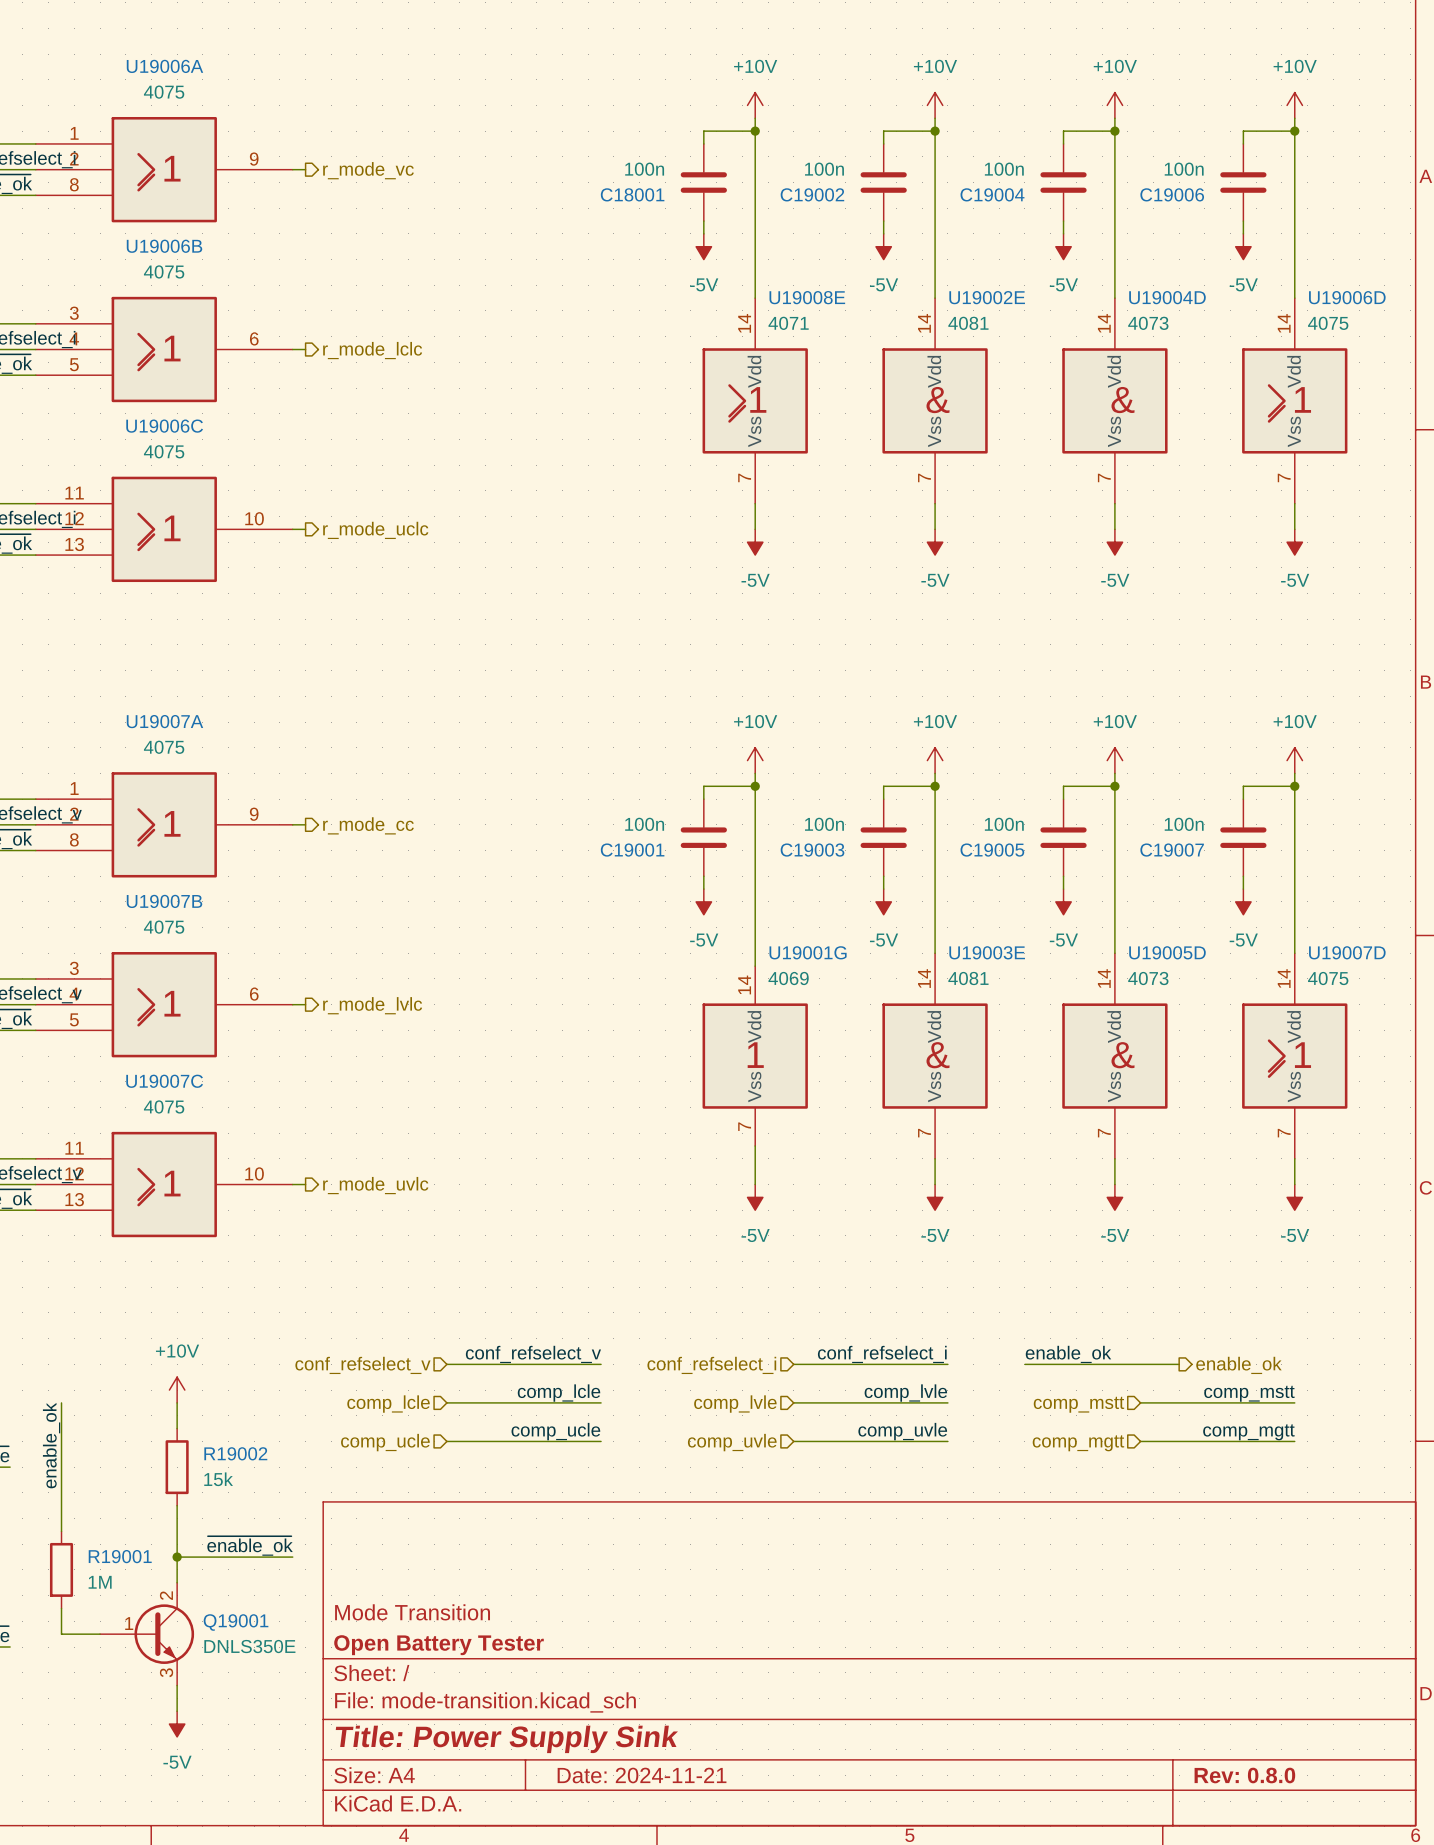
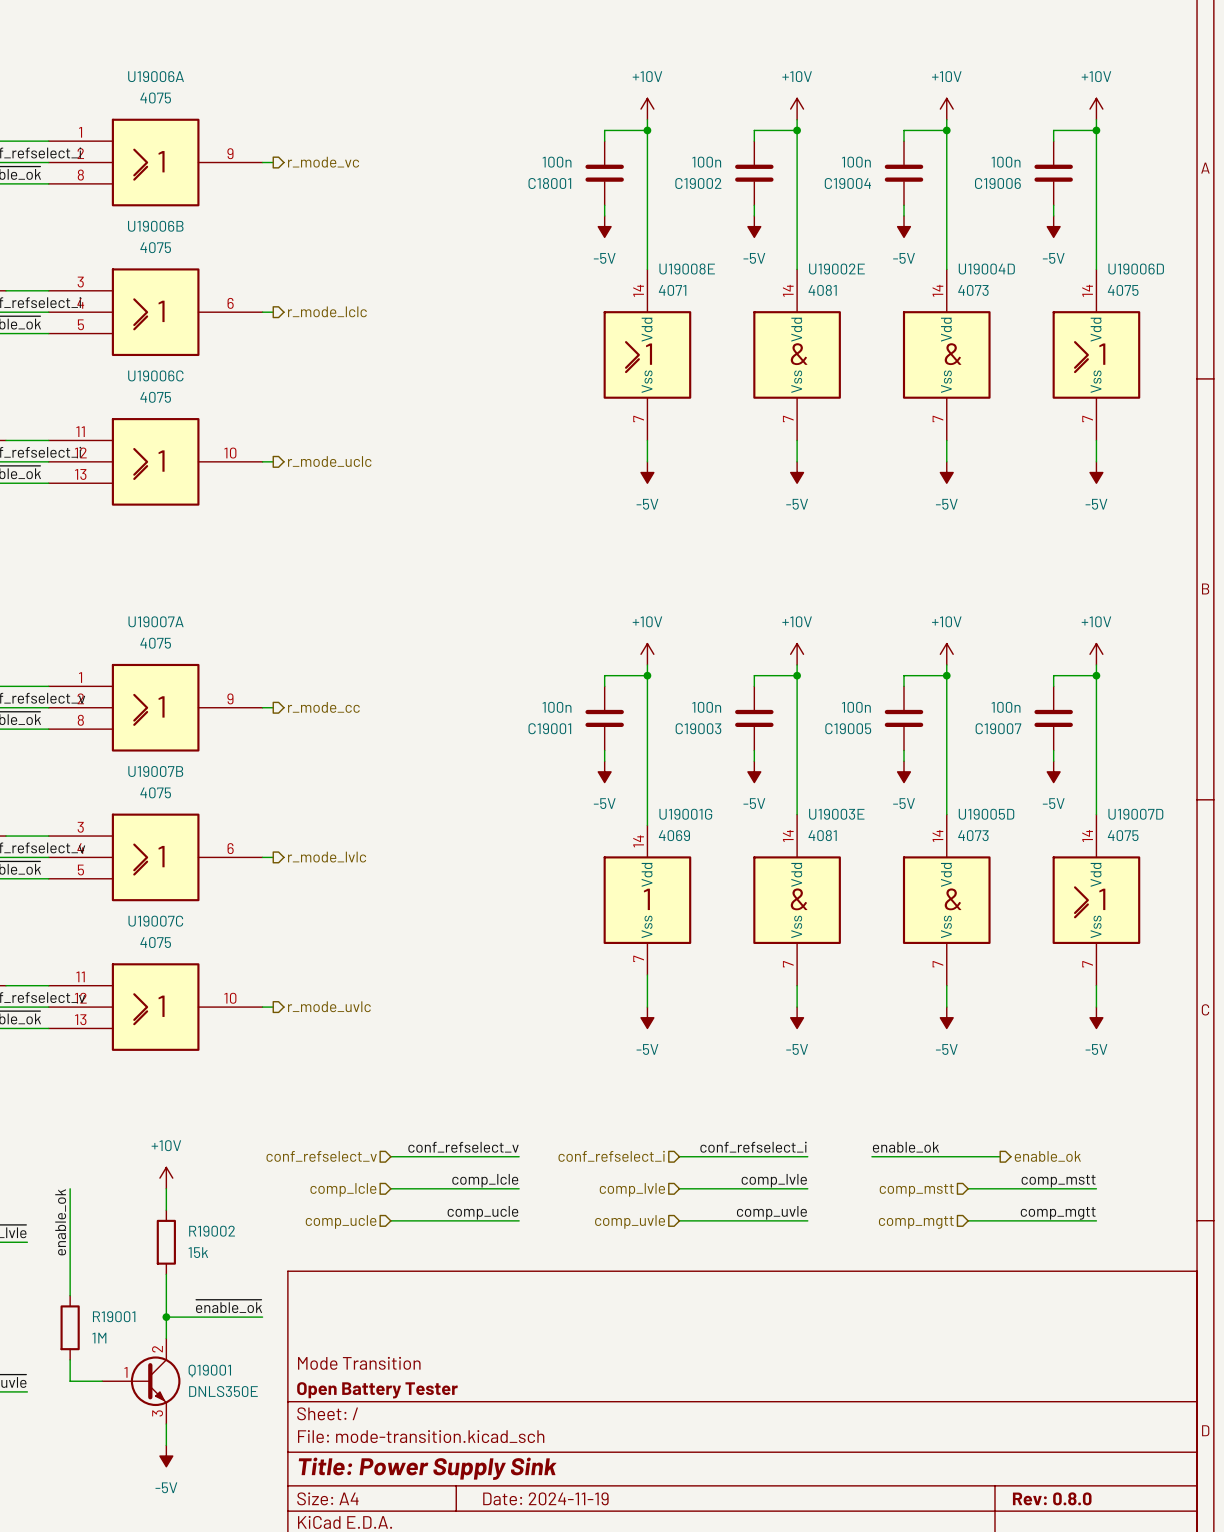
title block: Date: 2024-11-21 (642, 1775) -> Date: 2024-11-19 (545, 1498)

